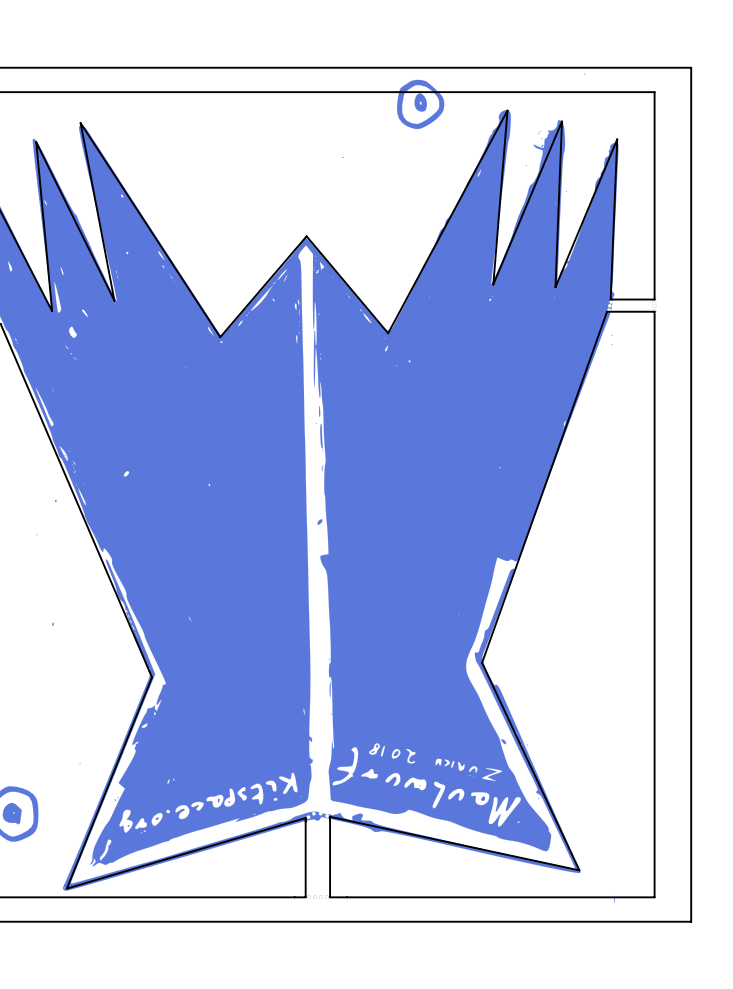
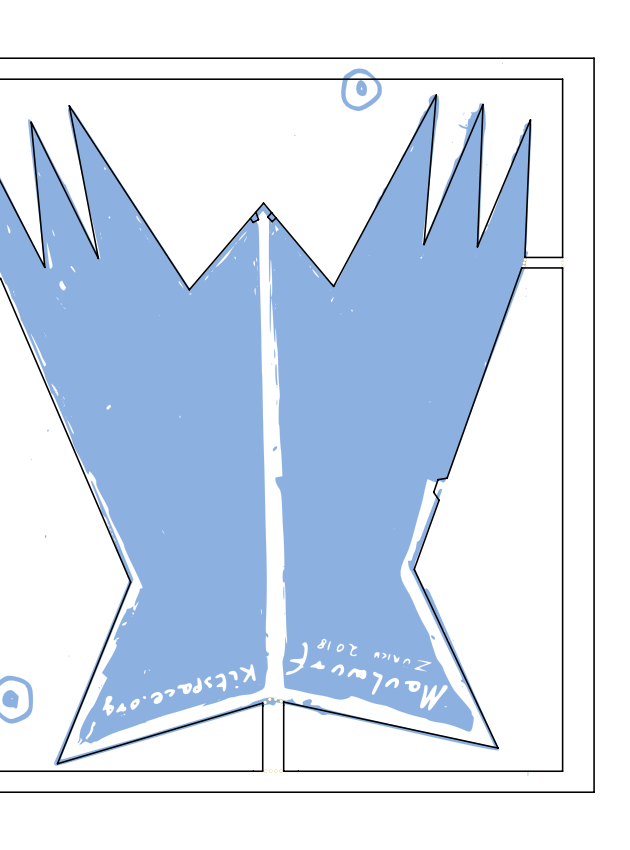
board edge: none -> (256, 212) (258, 219) (253, 222) (250, 218)
board edge: none -> (271, 212) (267, 217) (272, 221) (276, 217)
board edge: (607, 311) (482, 662) -> (521, 267) (447, 478)
board edge: none -> (446, 478) (438, 479) (433, 492) (439, 500) (414, 569)

